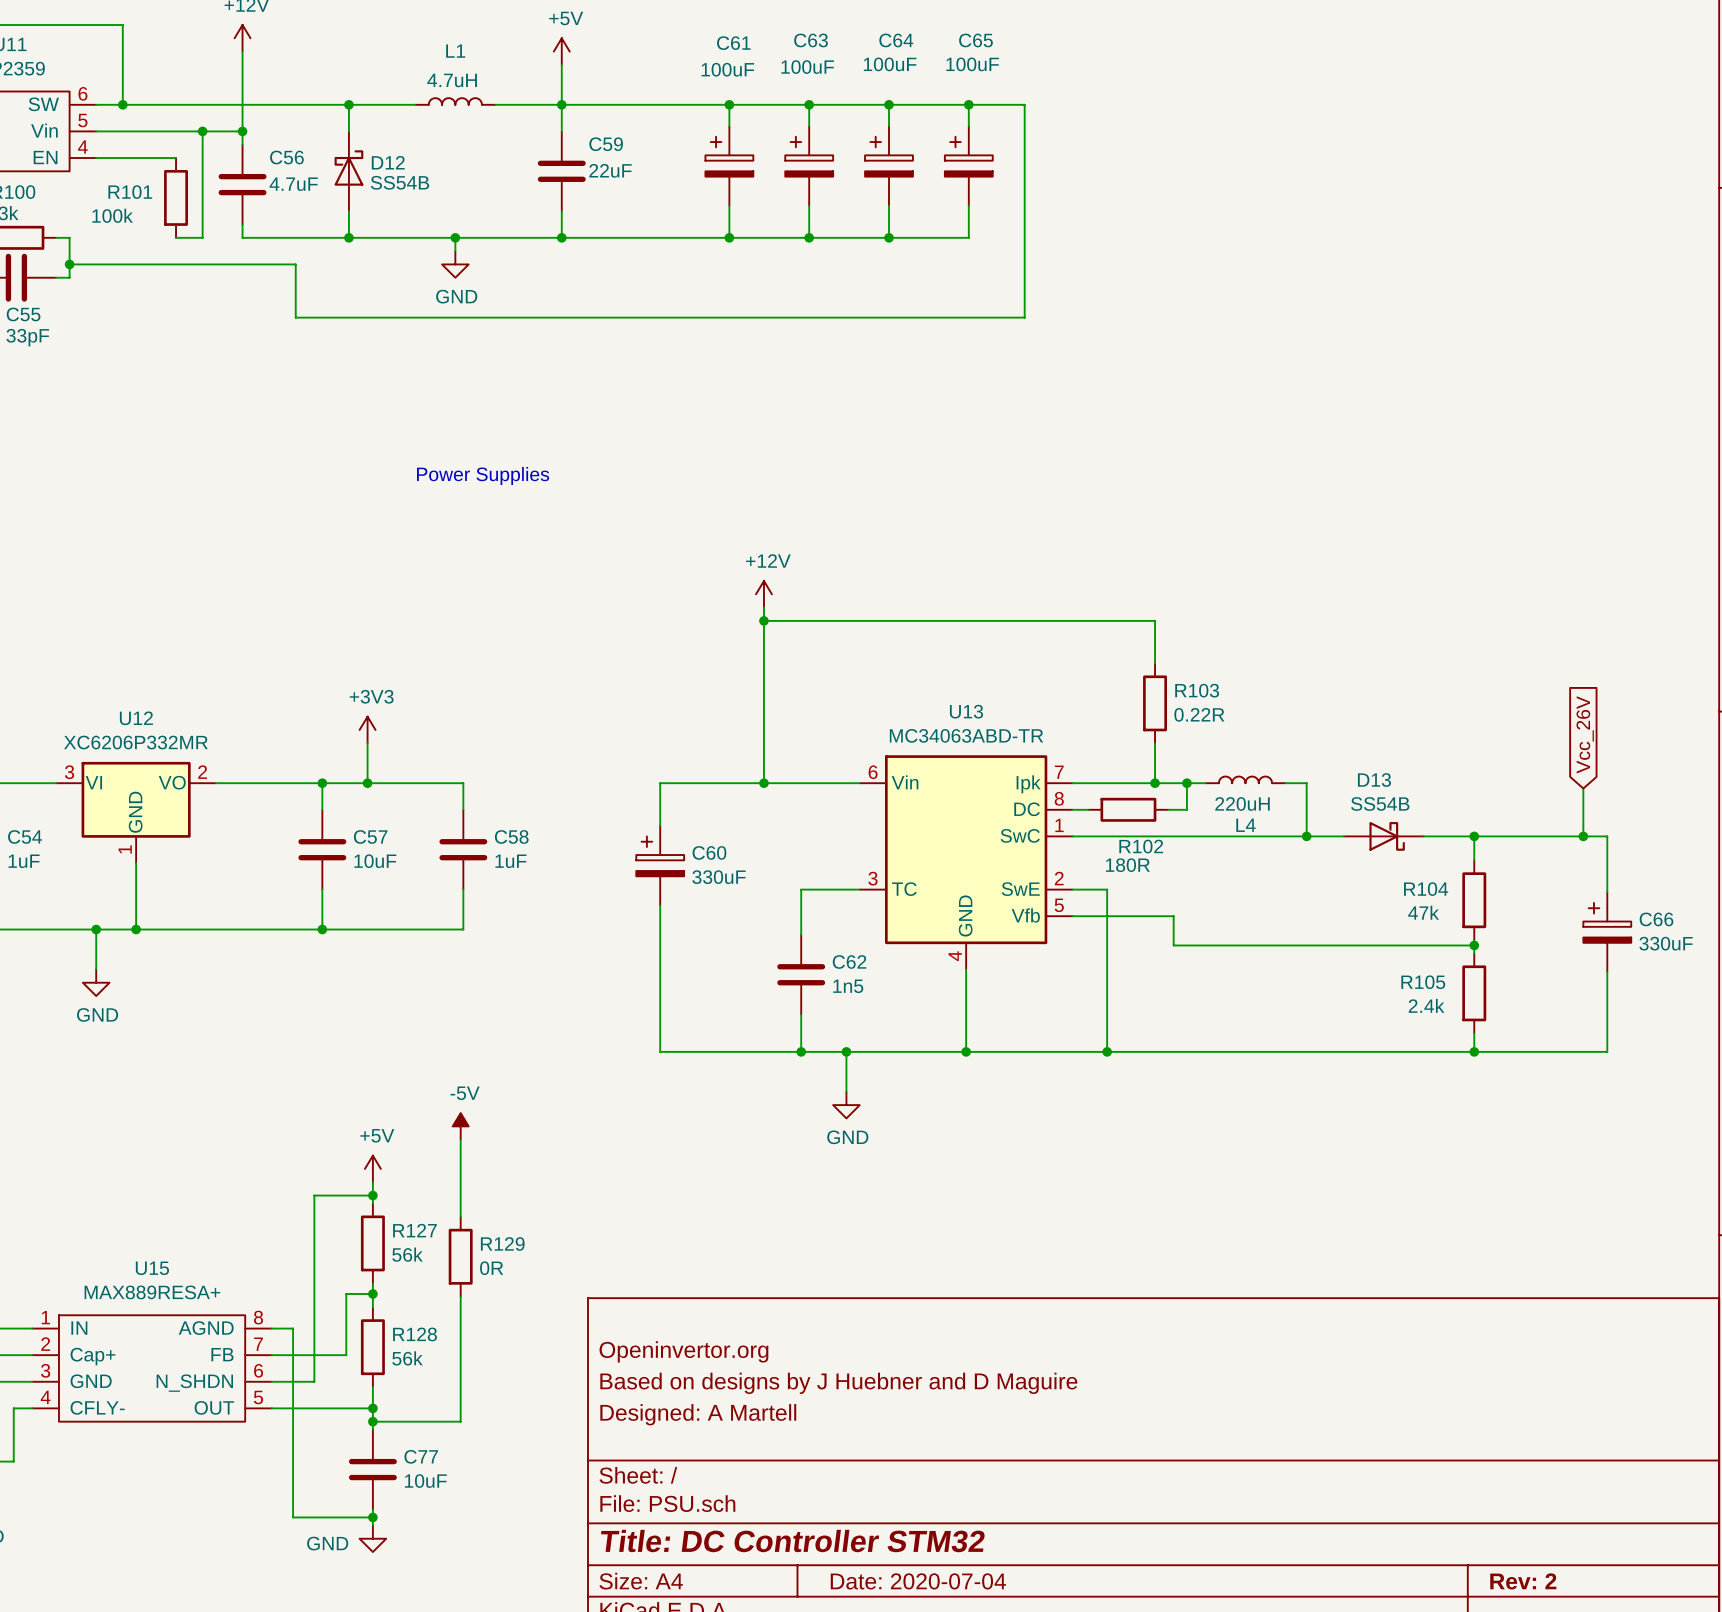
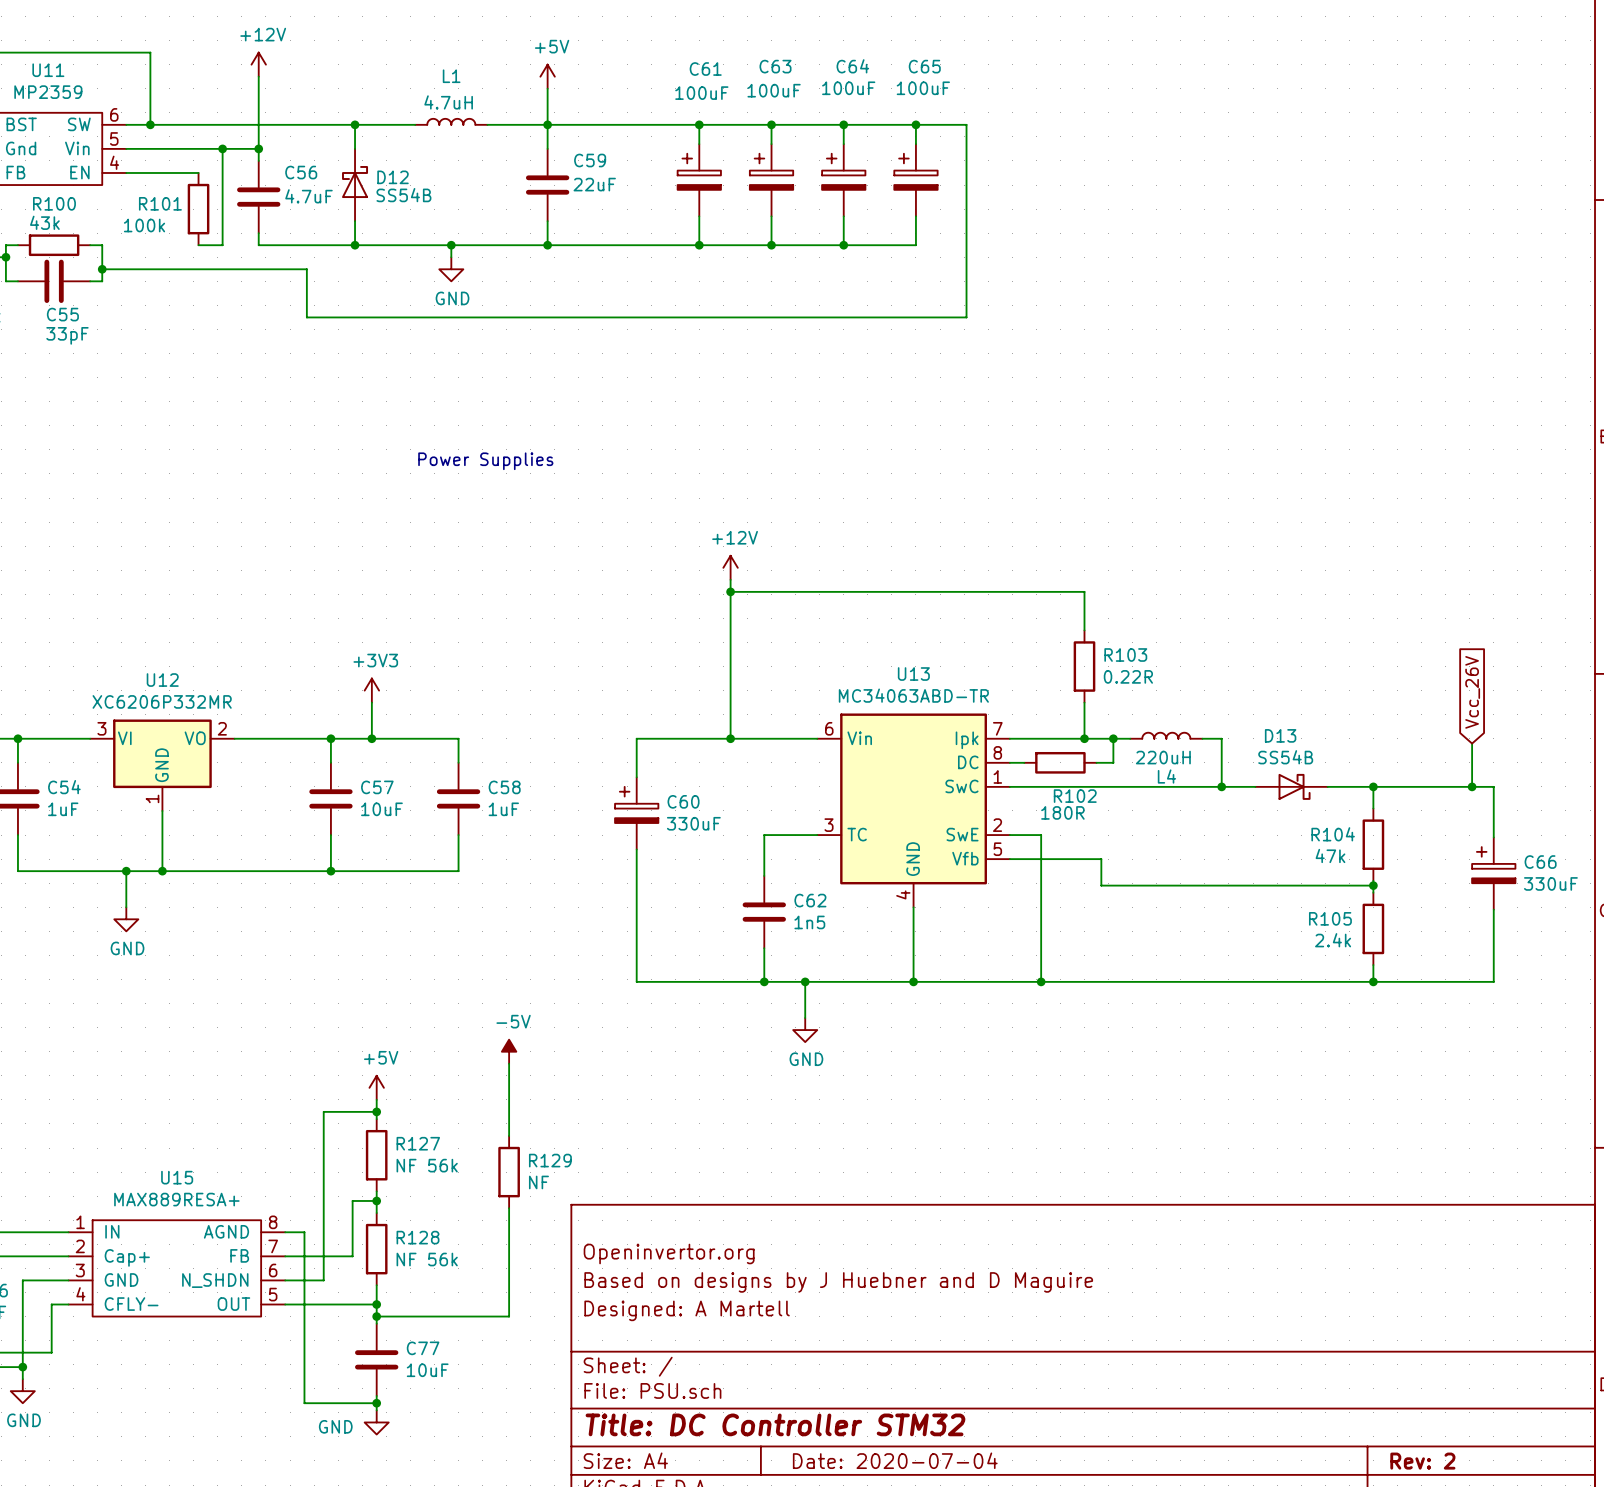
power symbol position: -5V (460, 1126) -> -5V (509, 1051)
wire: (460, 1139) (460, 1216) -> none
wire: none -> (509, 1063) (509, 1135)
R127 value: 56k (407, 1254) -> NF 56k (427, 1165)
R129 position: (460, 1256) -> (509, 1172)
R129 value: 0R (491, 1268) -> NF (538, 1182)
wire: (460, 1296) (460, 1421) -> (509, 1208) (509, 1316) (456, 1316)
R128 value: 56k (407, 1358) -> NF 56k (427, 1259)

